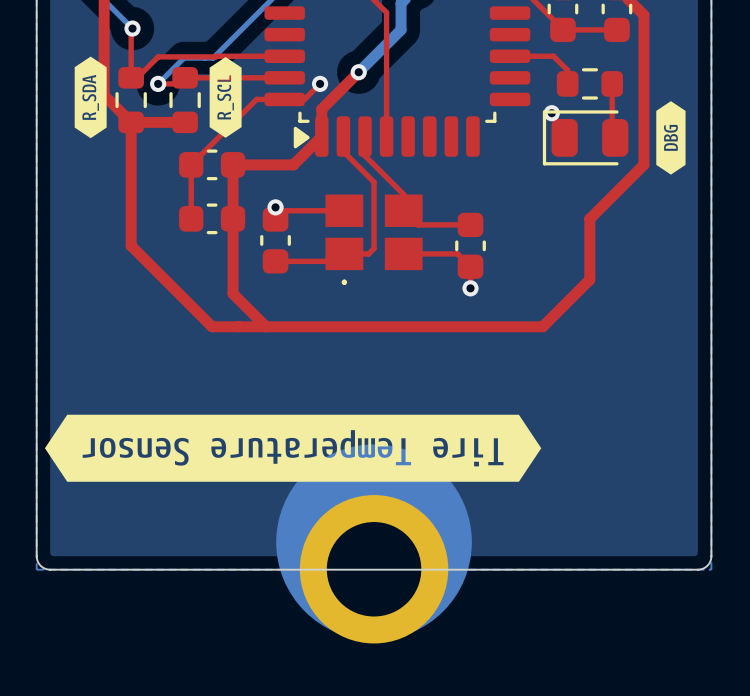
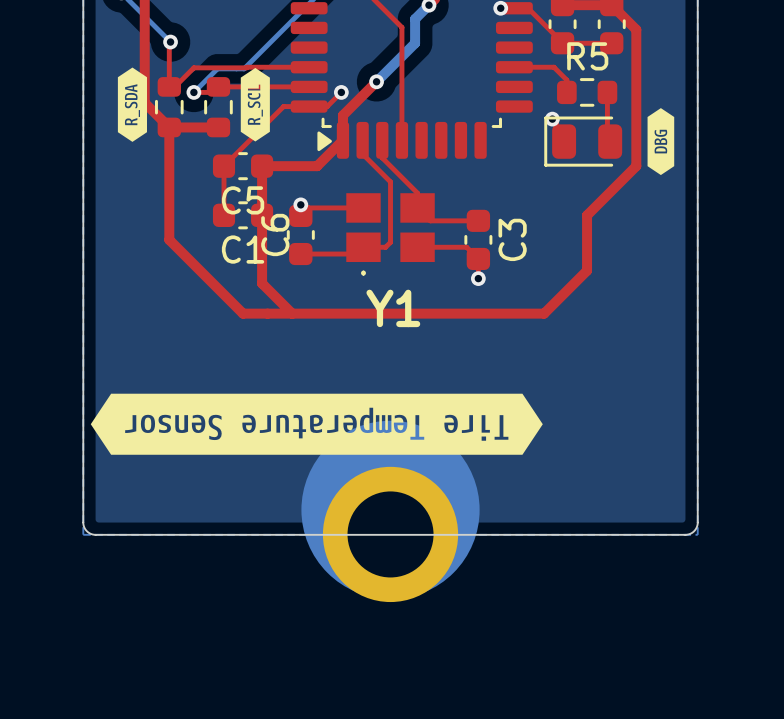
R5 name: none -> R5 (587, 56)
C5 name: none -> C5 (243, 200)
C6 name: none -> C6 (275, 234)
C3 name: none -> C3 (512, 239)
C1 name: none -> C1 (243, 249)
Y1 name: none -> Y1 (393, 308)

